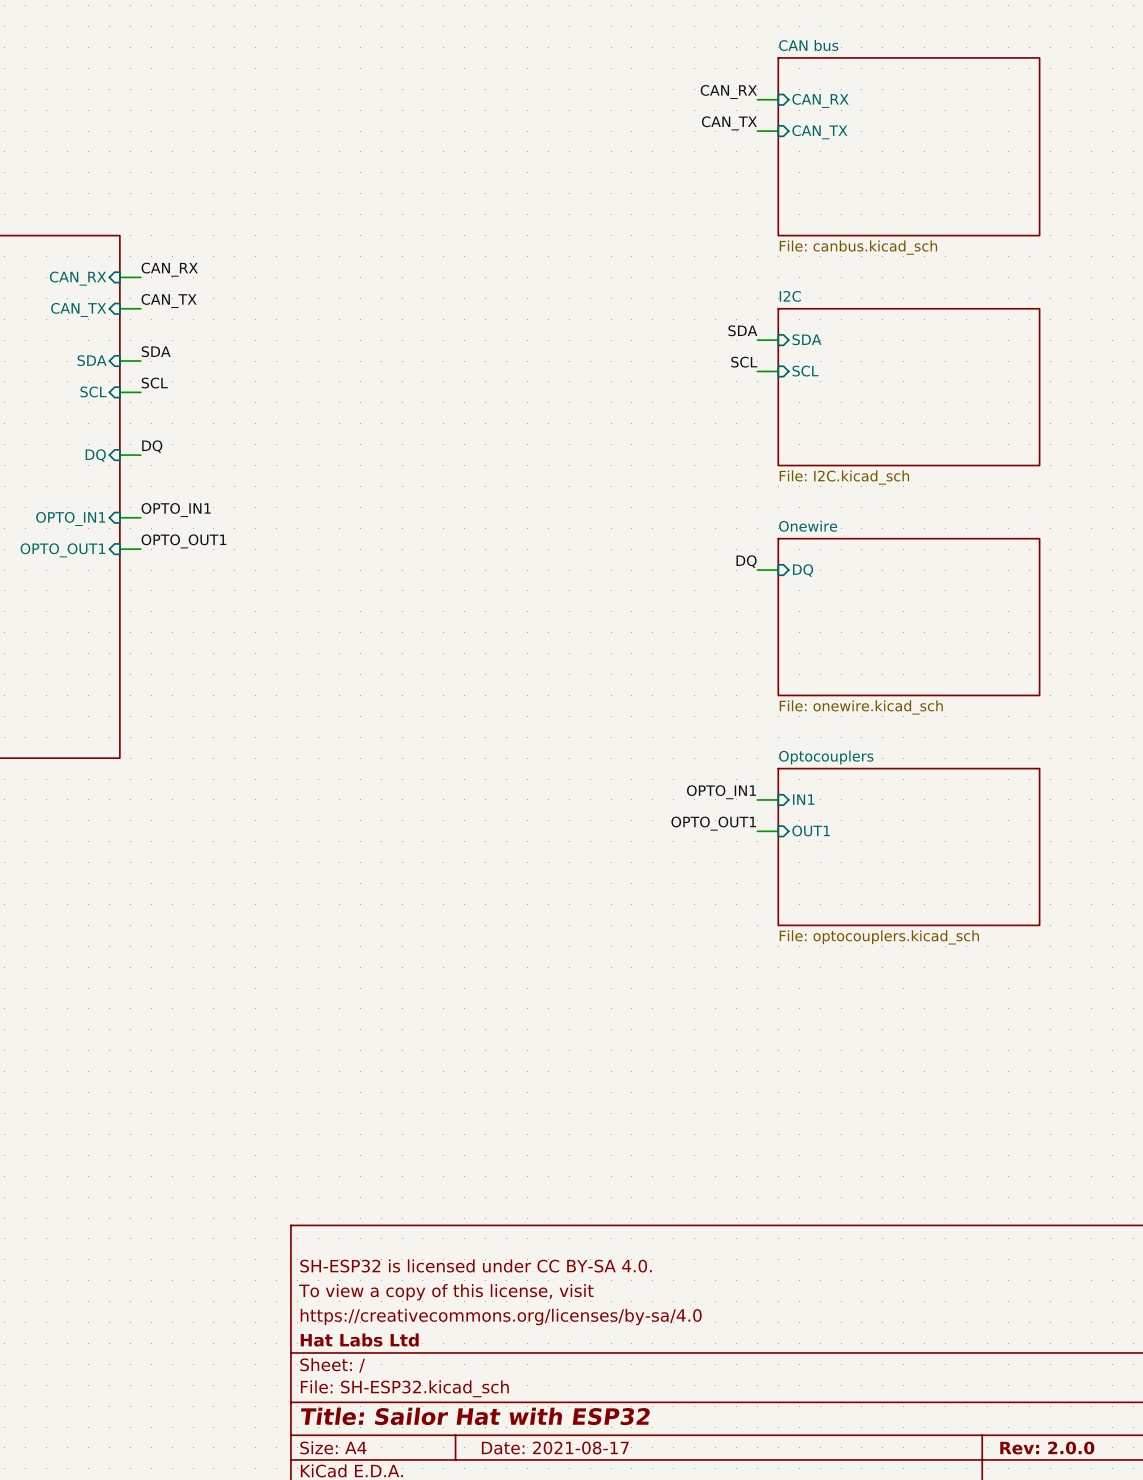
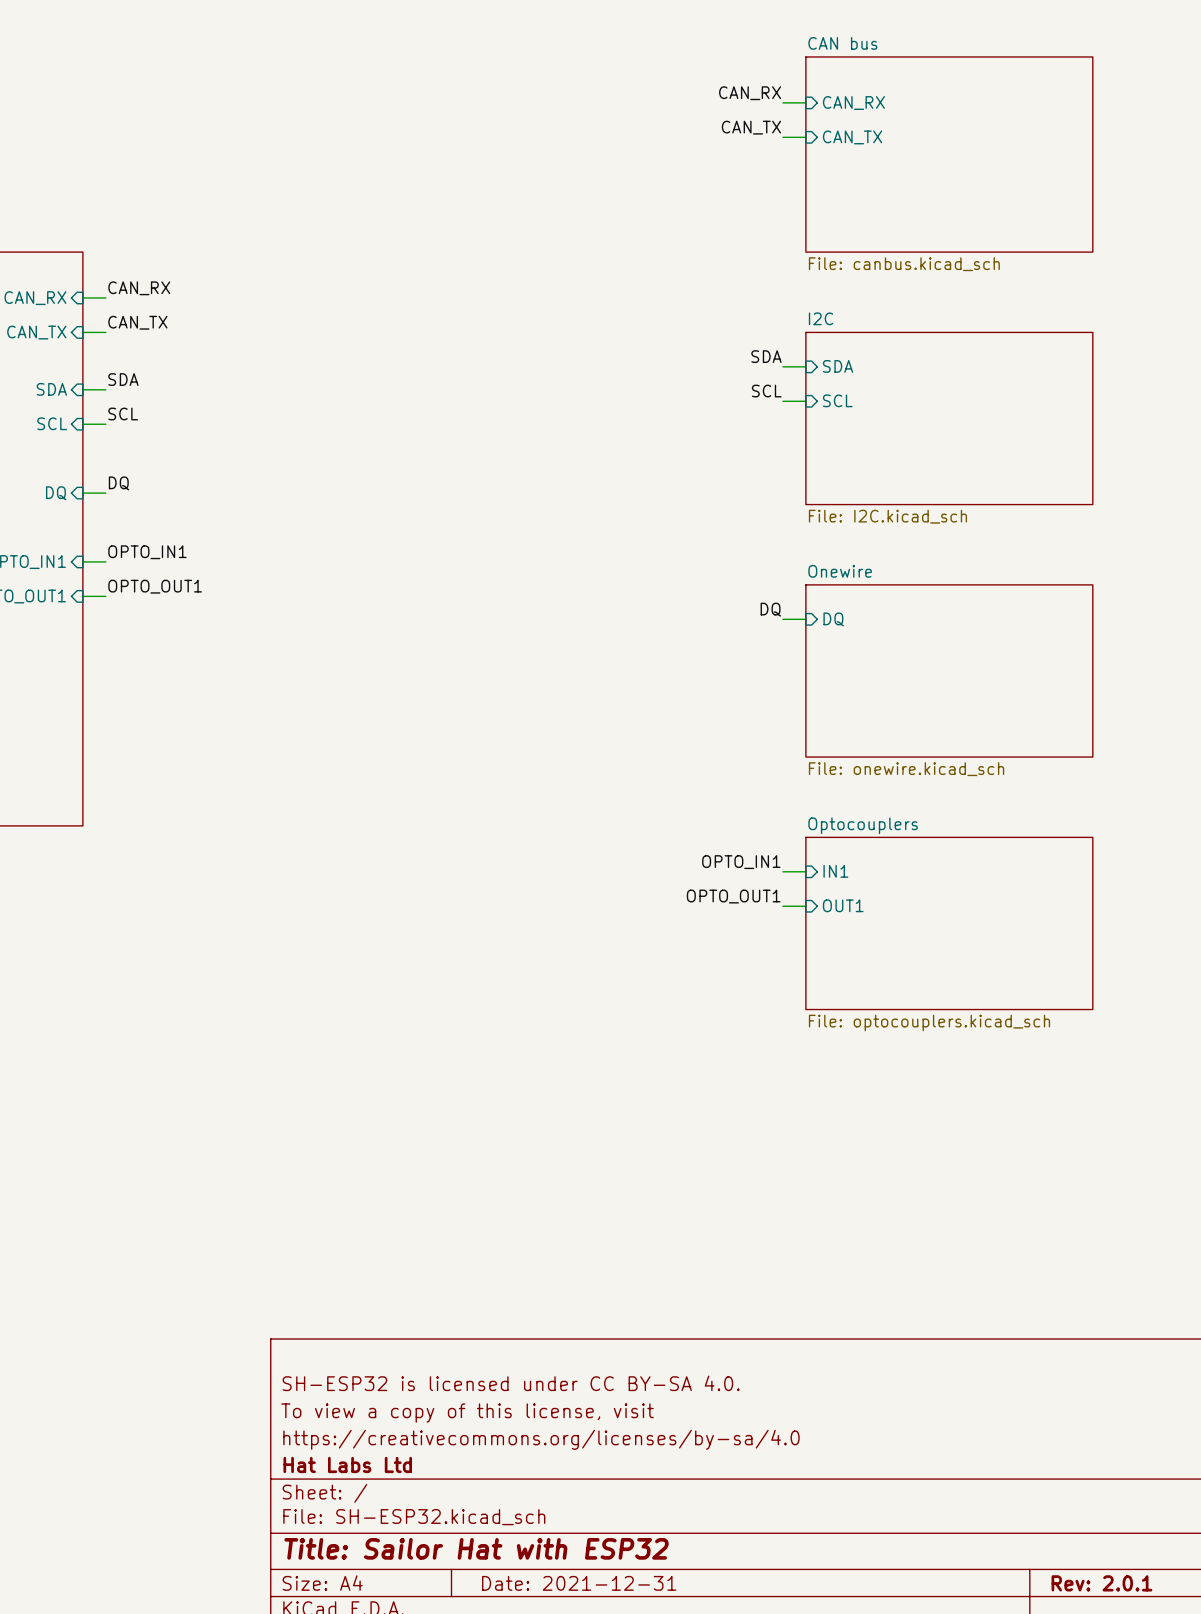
title block: Date: 2021-08-17 (555, 1447) -> Date: 2021-12-31 (579, 1583)
title block: Rev: 2.0.0 (1047, 1447) -> Rev: 2.0.1 (1101, 1583)

